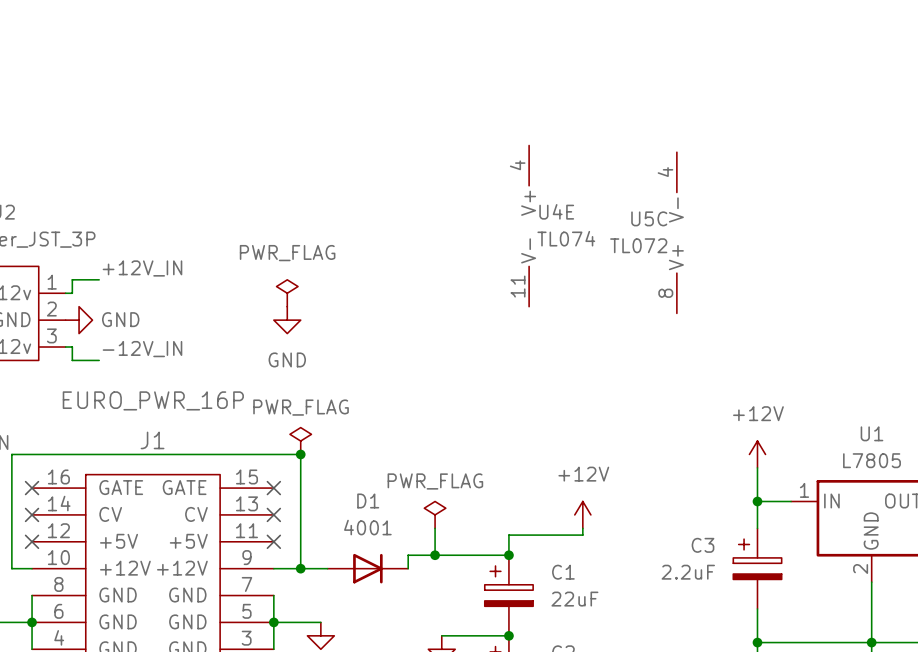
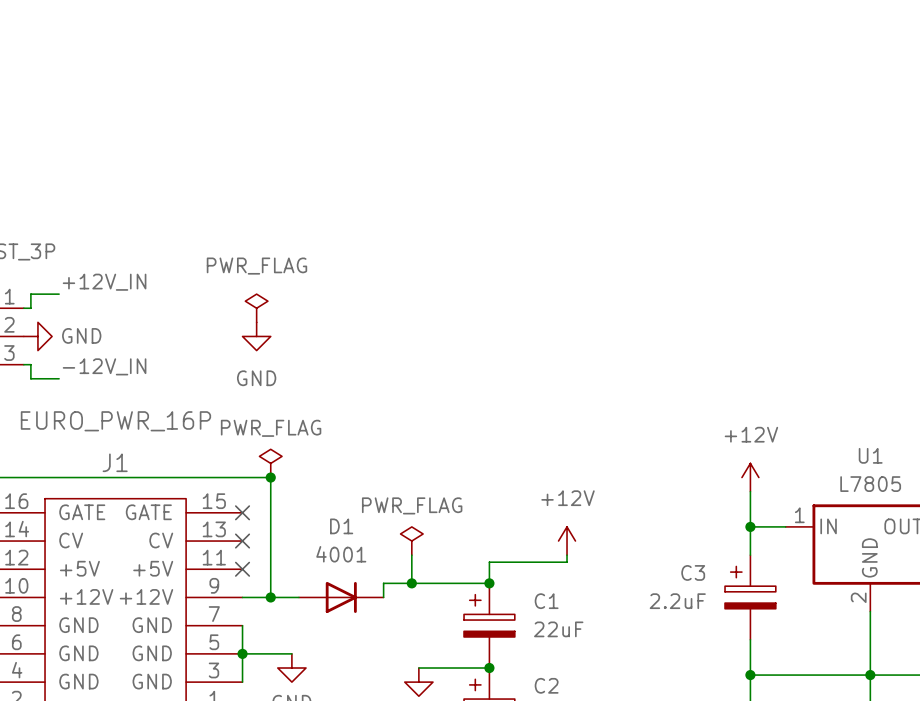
U4E: TL074 (529, 226) -> none
U5C: TL072 (676, 232) -> none

